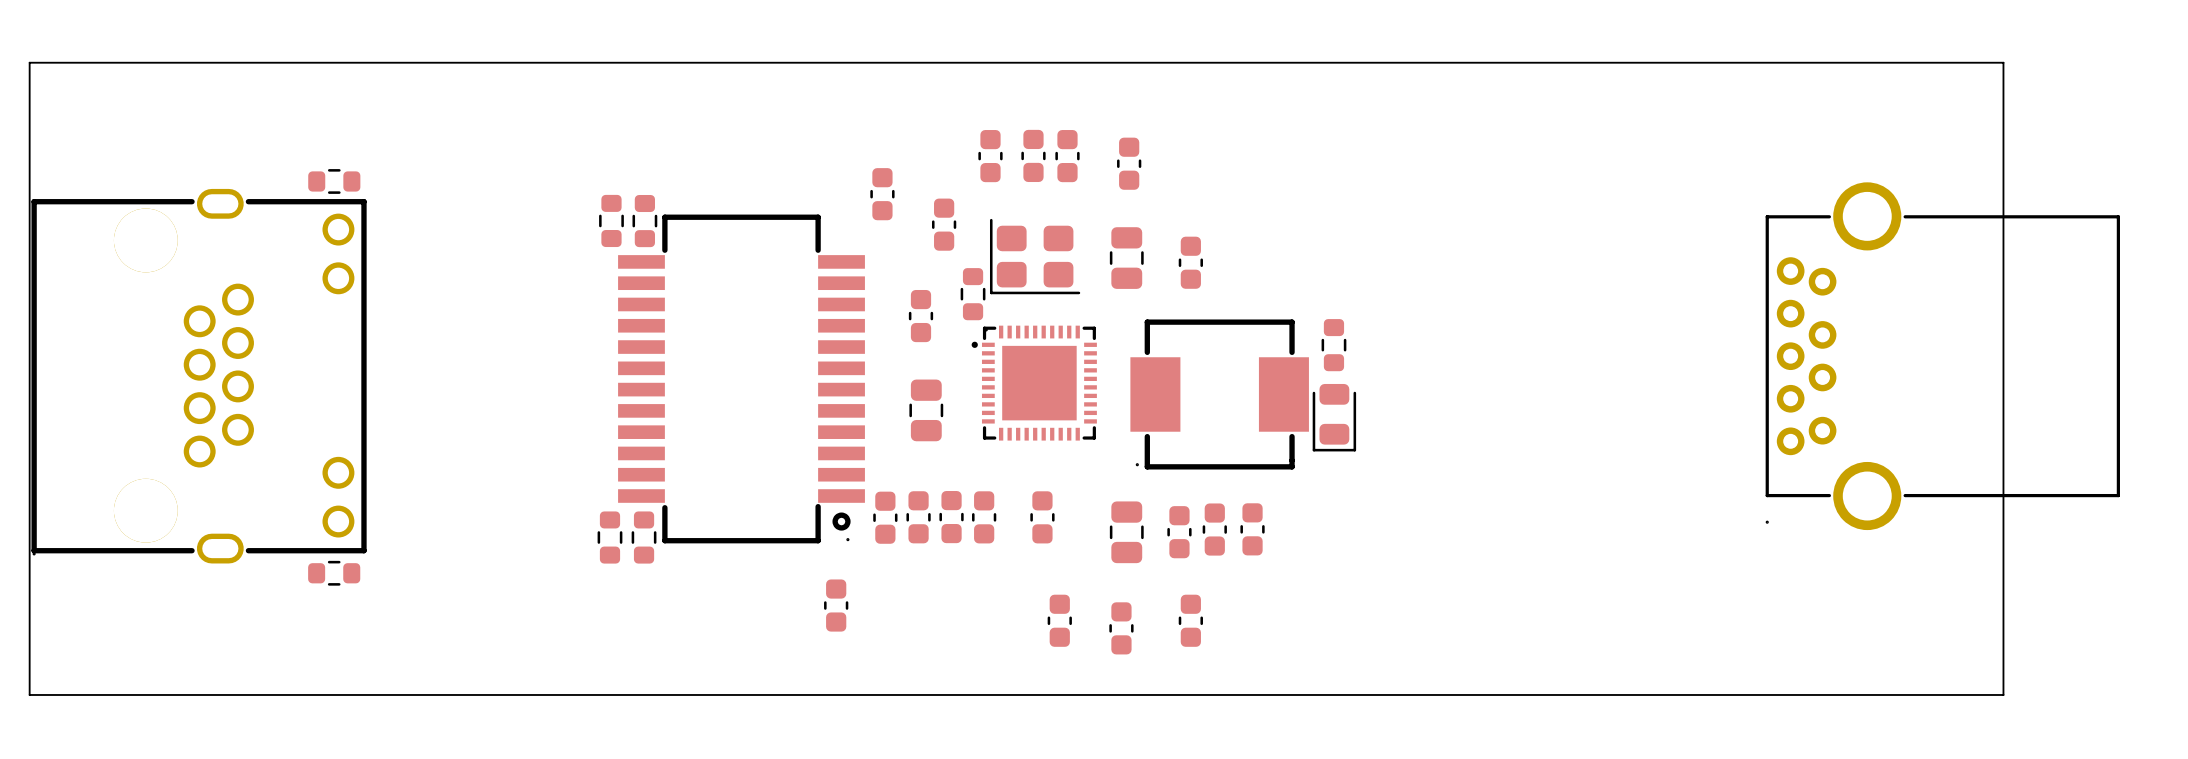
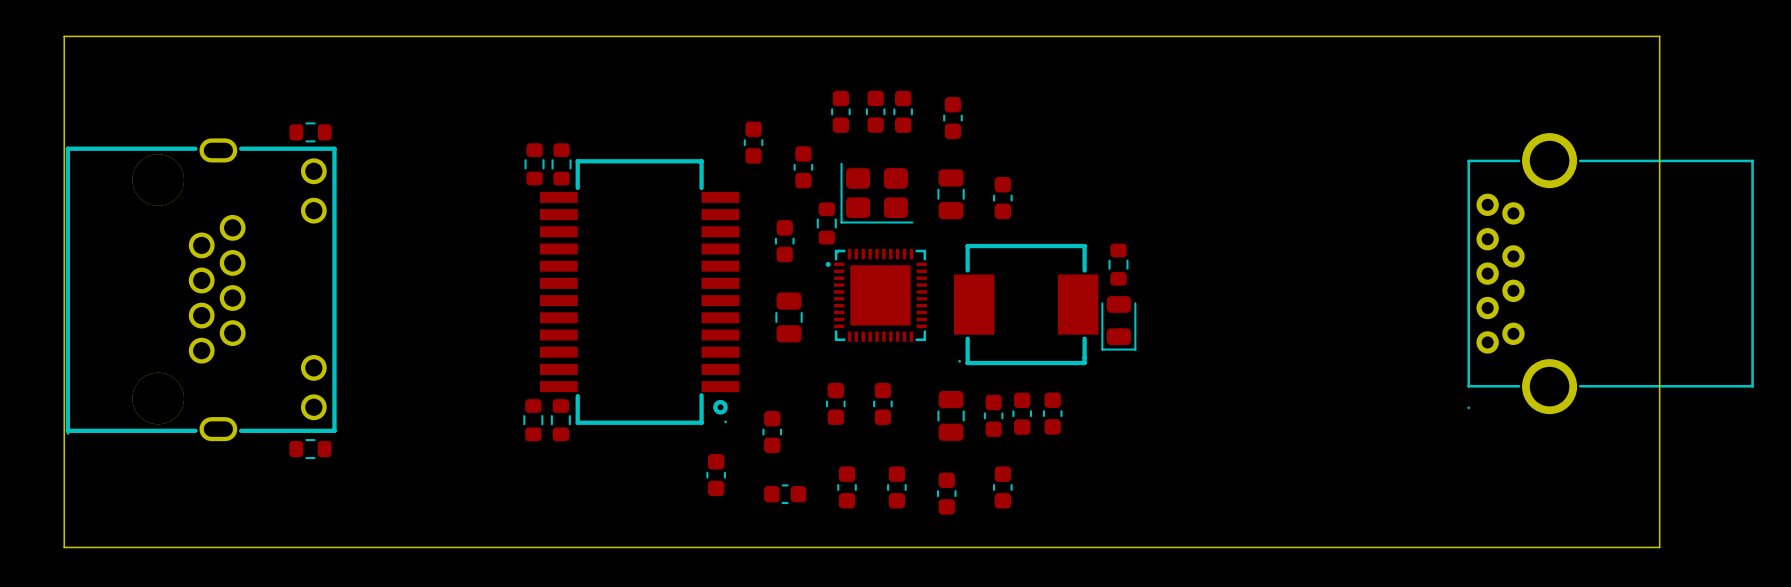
part: (885, 517) -> none
part: (918, 517) -> none
part: (951, 517) -> none
part: none -> (772, 432)
part: none -> (847, 487)
part: none -> (785, 494)

